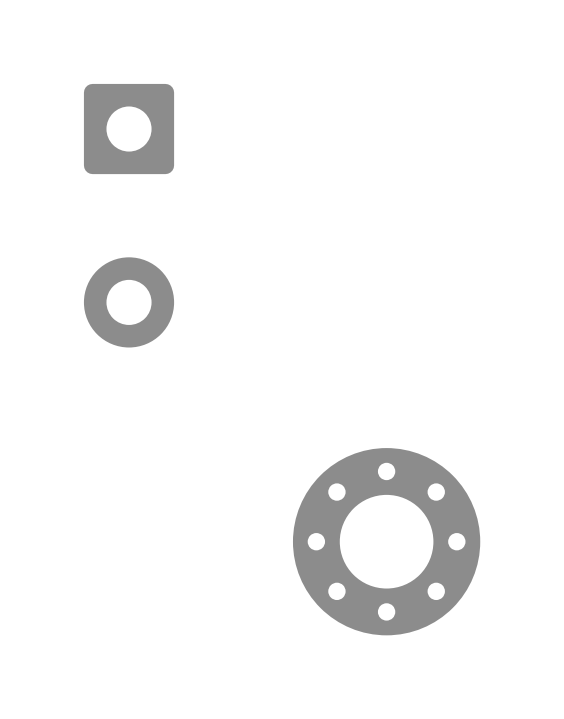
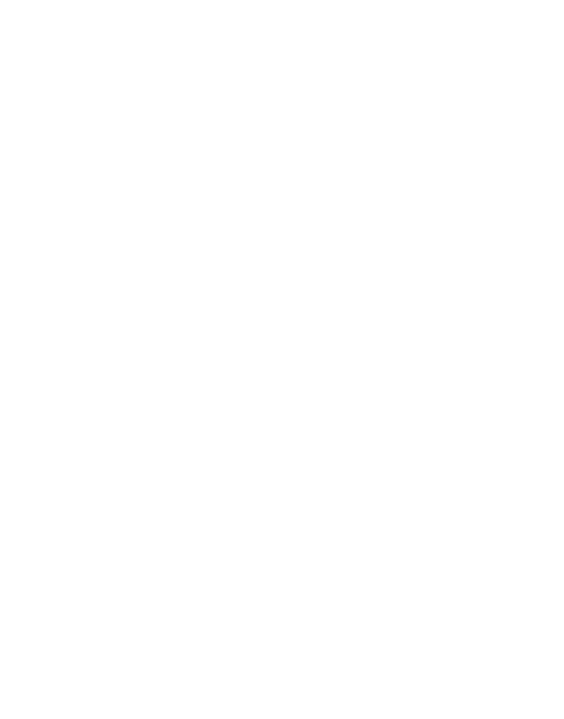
part: (129, 215) -> none
part: (386, 541) -> none

